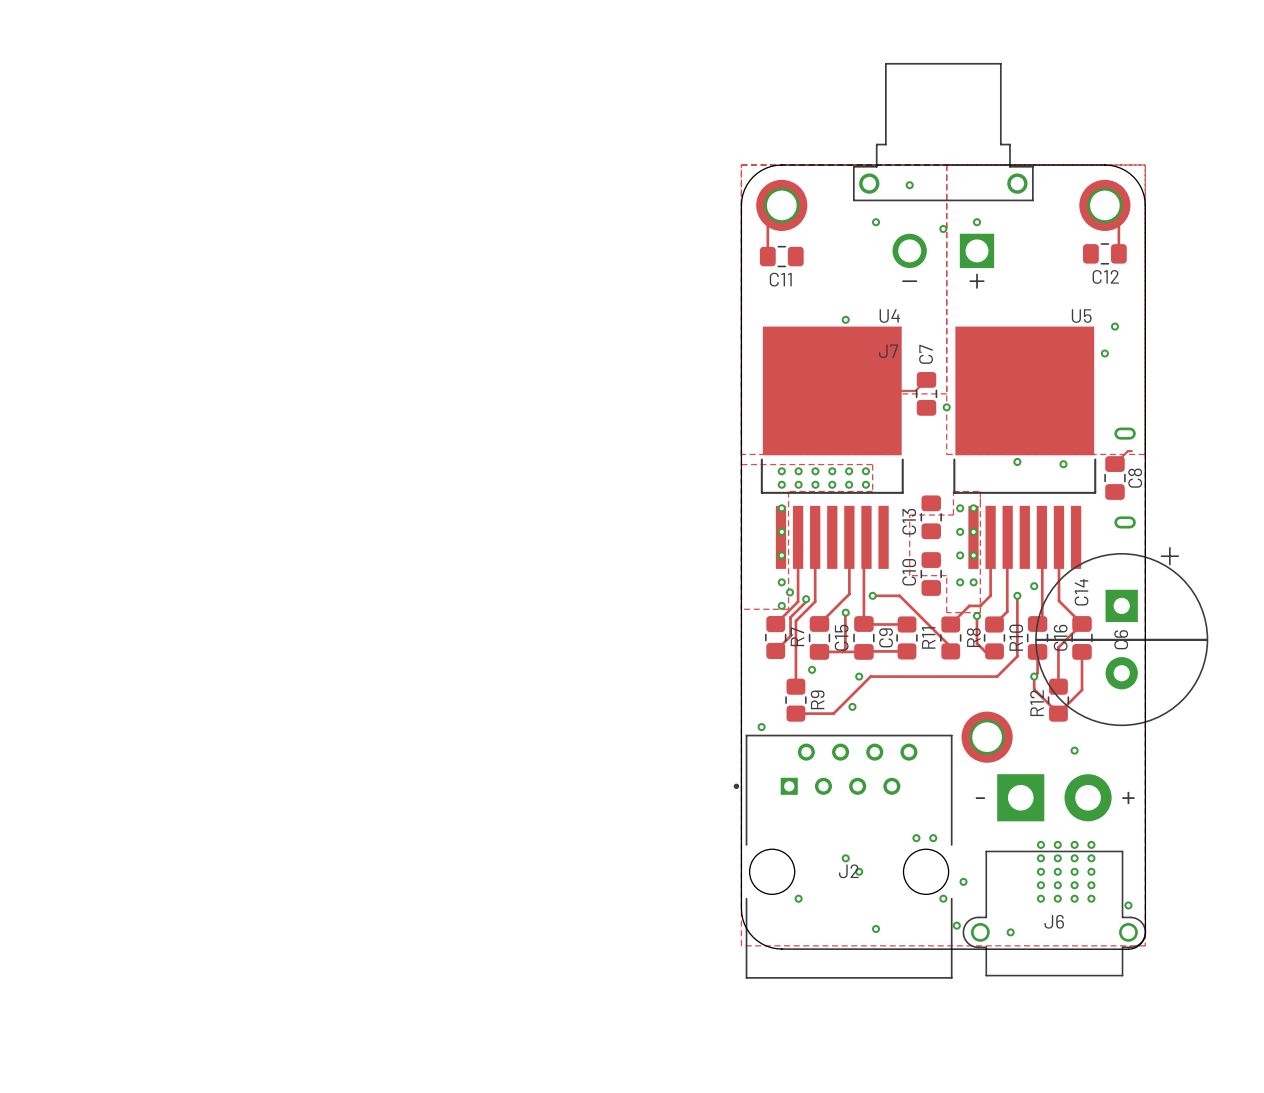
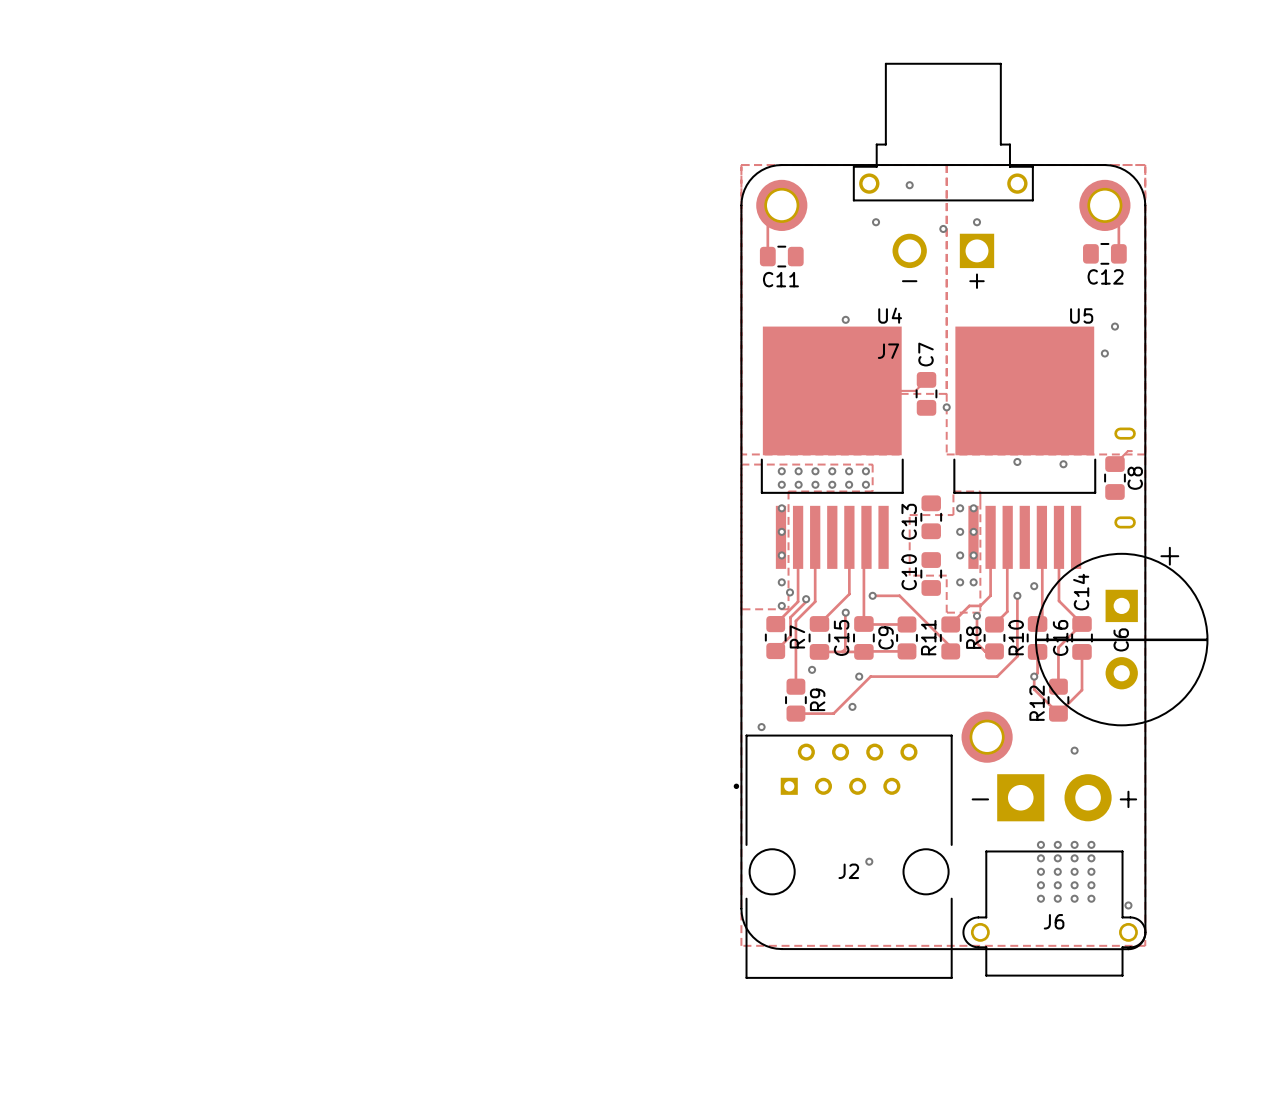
via: (916, 838) -> none
via: (933, 838) -> none
via: (845, 858) -> none
via: none -> (869, 861)
via: (859, 871) -> none
via: (963, 881) -> none
via: (798, 898) -> none
via: (943, 898) -> none
via: (956, 925) -> none
via: (876, 929) -> none
via: (1010, 932) -> none

